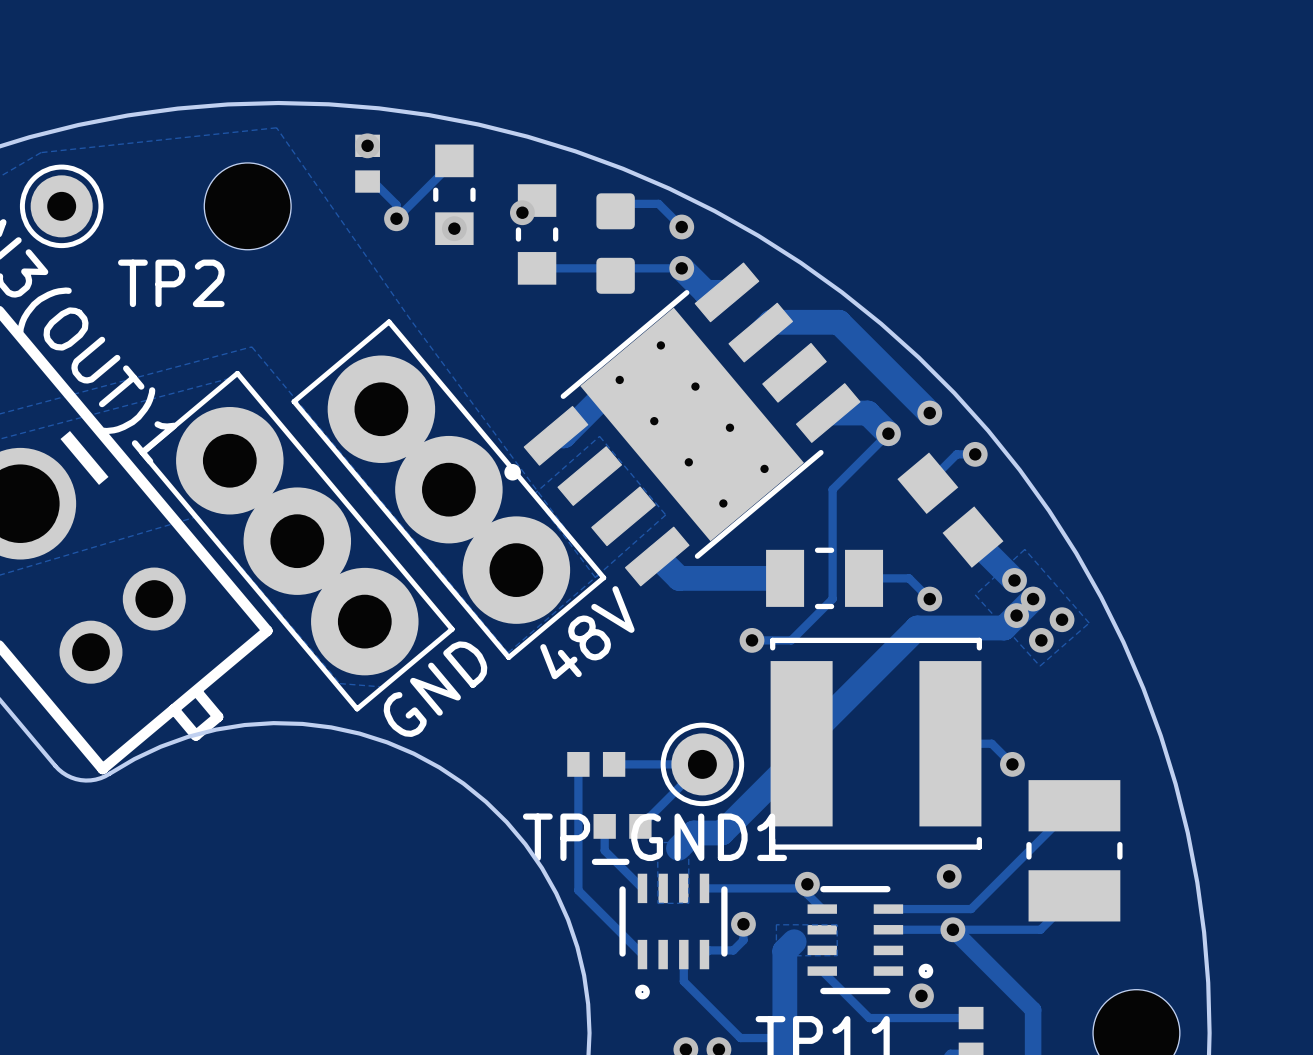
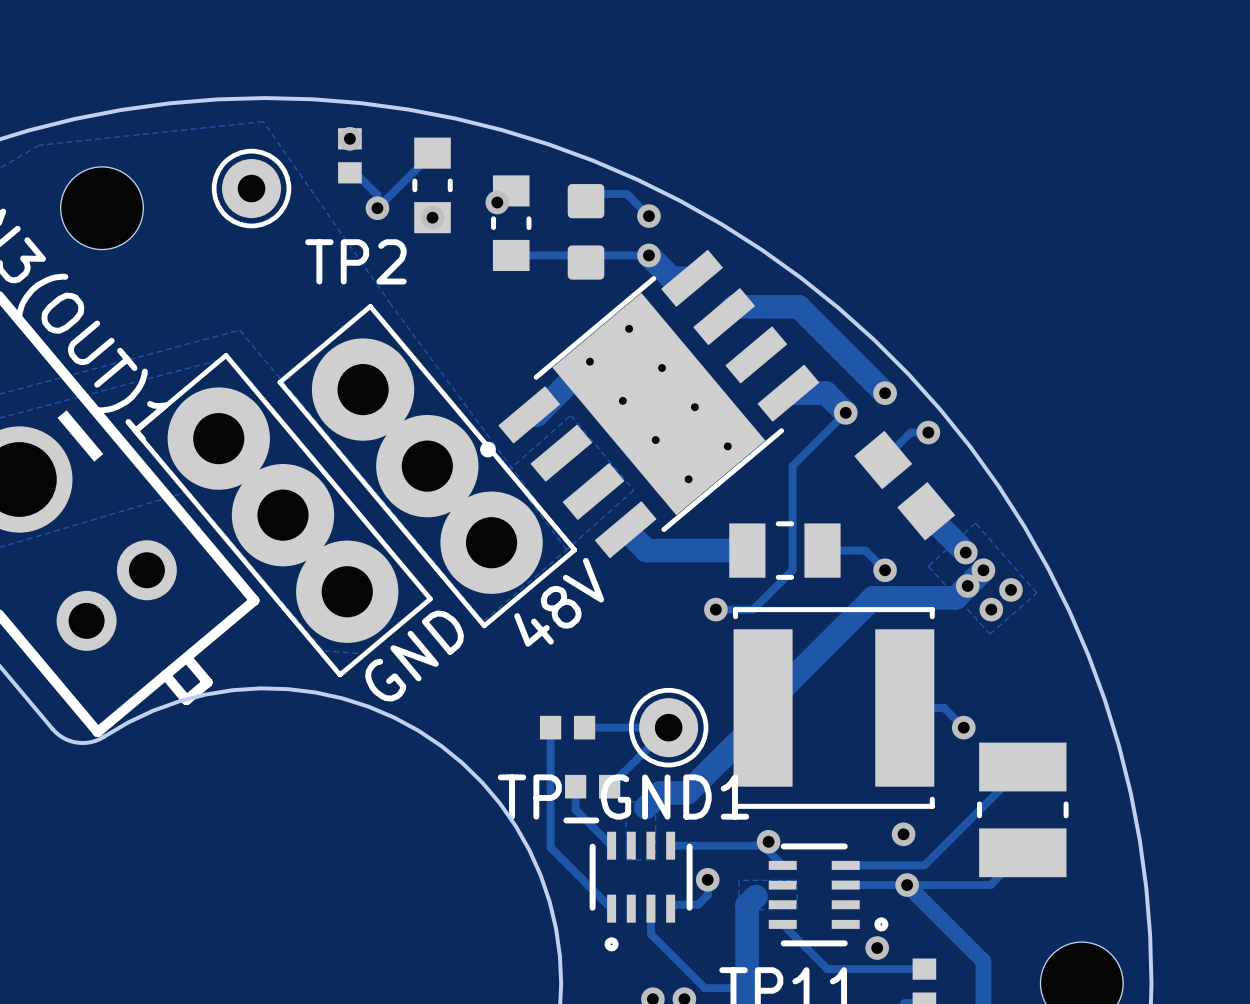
TP2 position: (61, 206) -> (251, 188)
part position: (247, 206) -> (102, 208)

